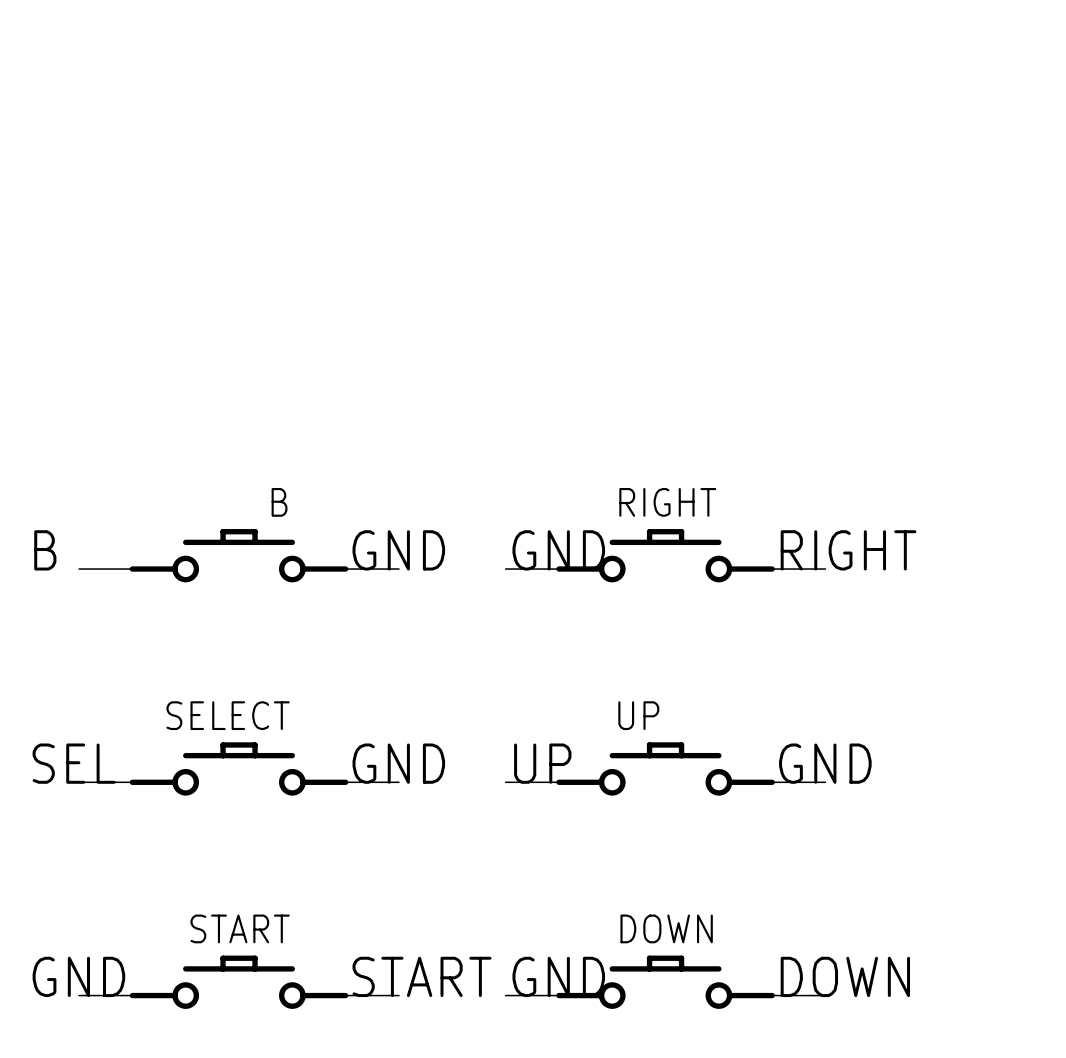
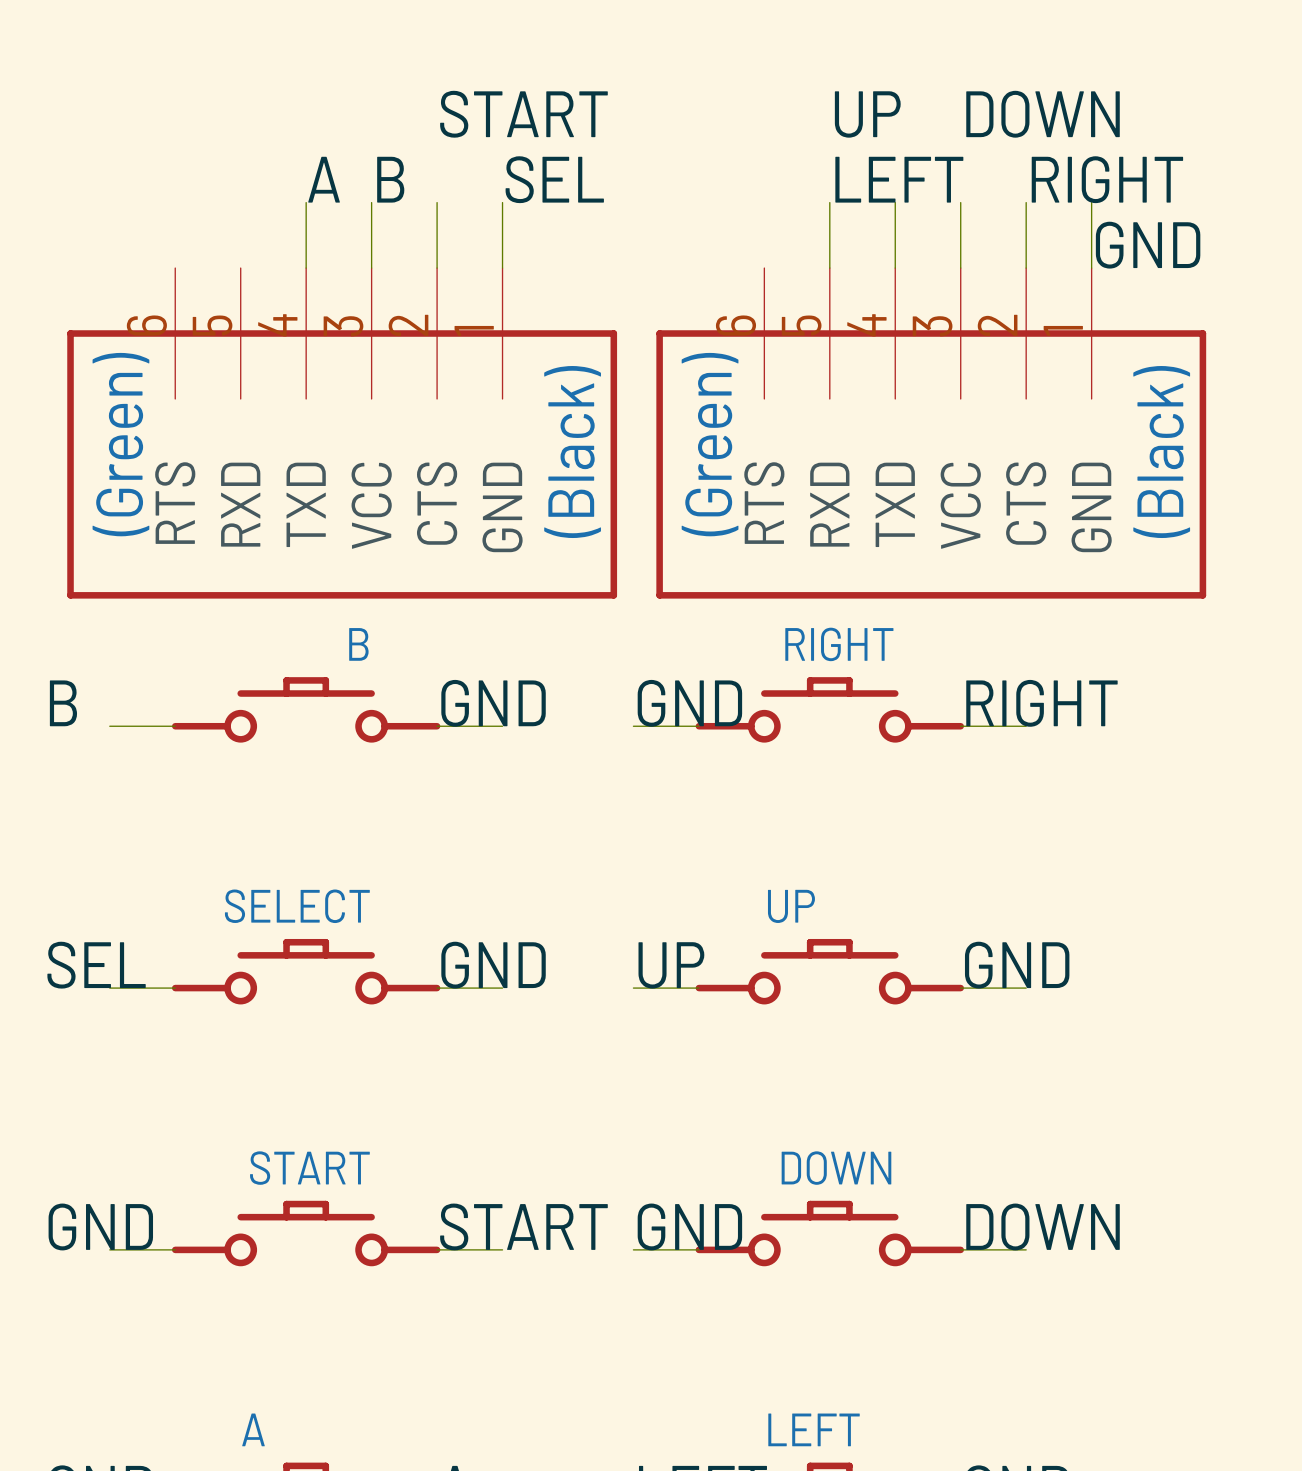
label: none -> START (523, 114)
label: none -> UP (867, 114)
label: none -> DOWN (1043, 114)
label: none -> A (323, 179)
label: none -> B (390, 179)
label: none -> SEL (554, 179)
label: none -> LEFT (899, 179)
label: none -> RIGHT (1107, 179)
wire: none -> (306, 202) (306, 268)
wire: none -> (371, 202) (371, 268)
wire: none -> (437, 202) (437, 268)
wire: none -> (502, 202) (502, 268)
wire: none -> (829, 202) (829, 268)
wire: none -> (895, 202) (895, 268)
wire: none -> (960, 202) (960, 268)
wire: none -> (1026, 202) (1026, 268)
wire: none -> (1091, 202) (1091, 268)
label: none -> GND (1148, 245)
part: none -> (342, 433)
part: none -> (931, 433)

